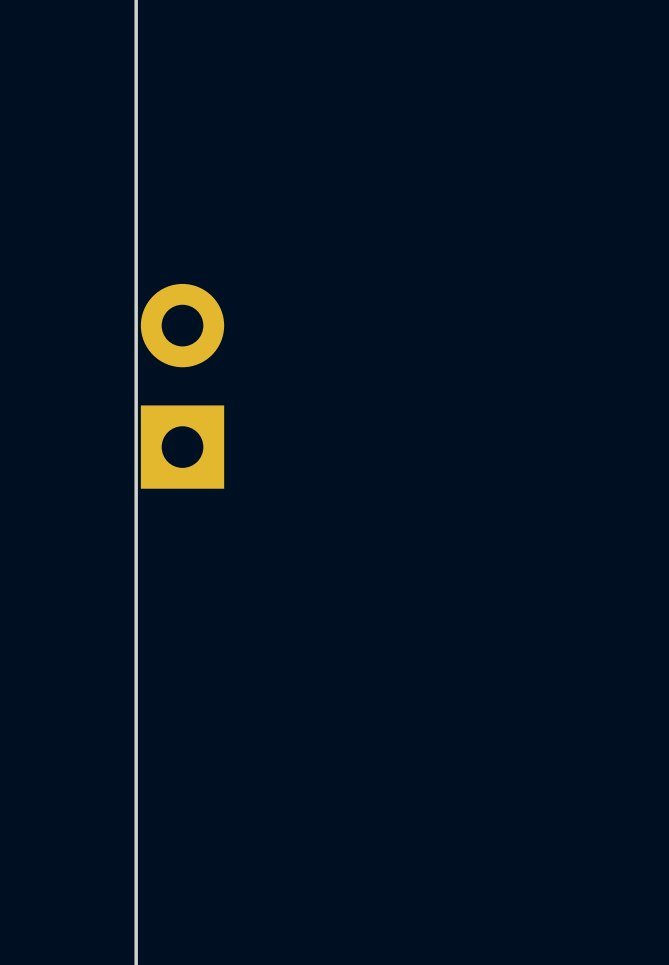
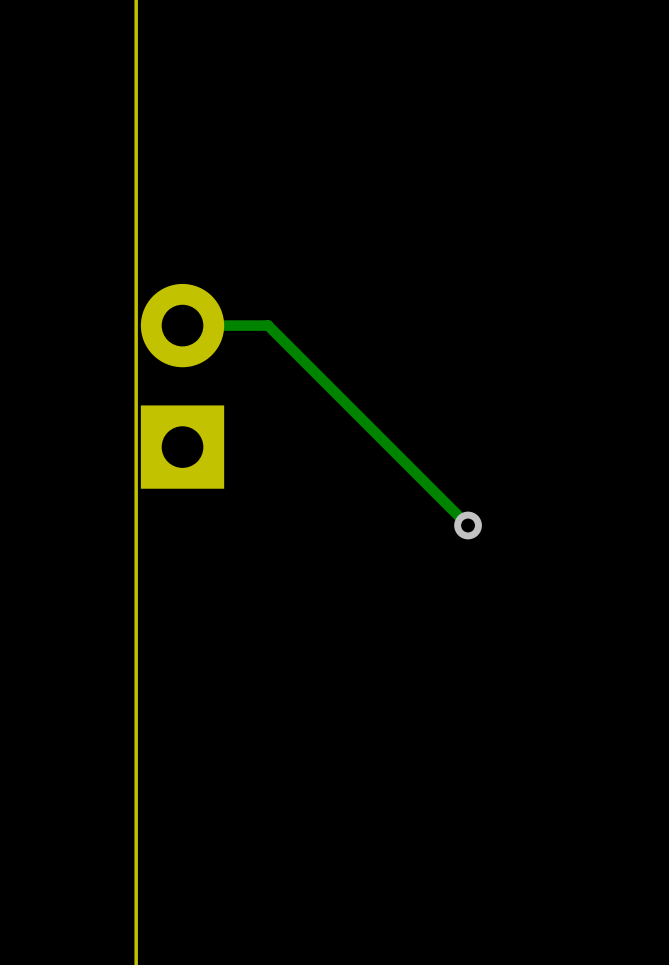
track: none -> (182, 325) (268, 325) (468, 525)
via: none -> (468, 525)

